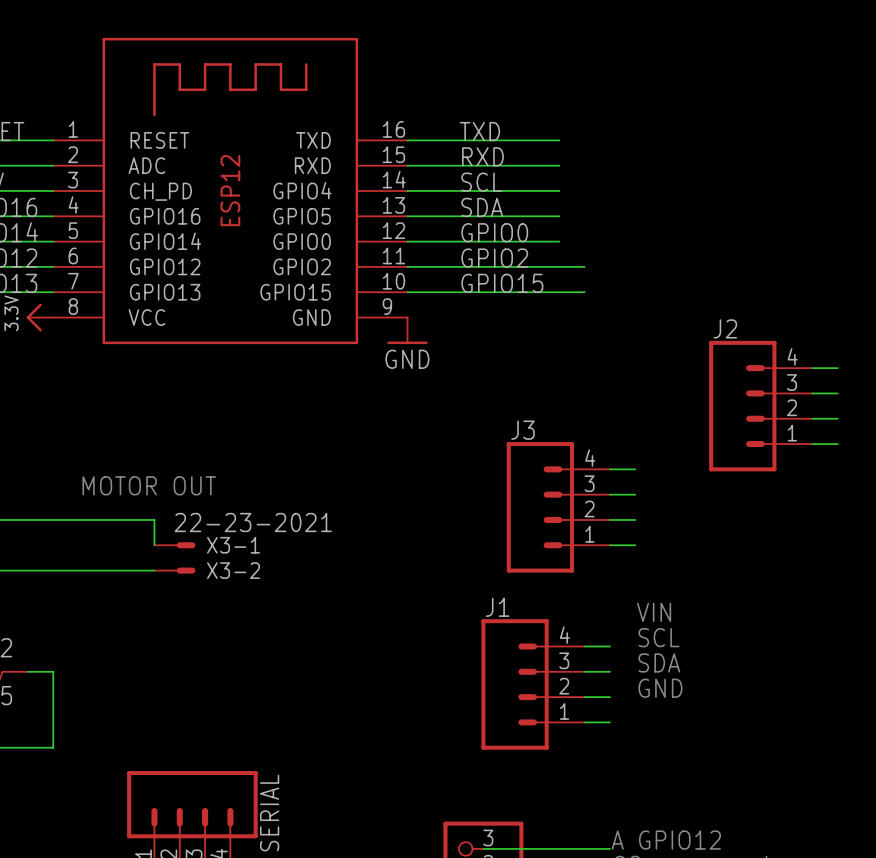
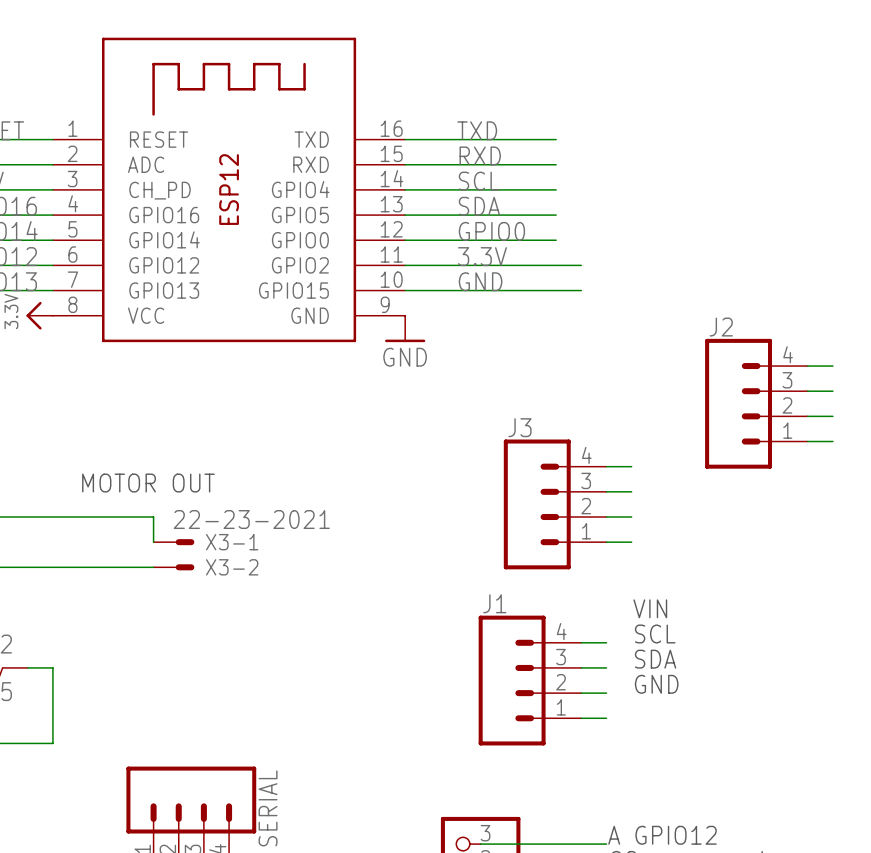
label: GPIO2 (494, 258) -> 3.3V (482, 256)
label: GPIO15 (502, 283) -> GND (480, 281)

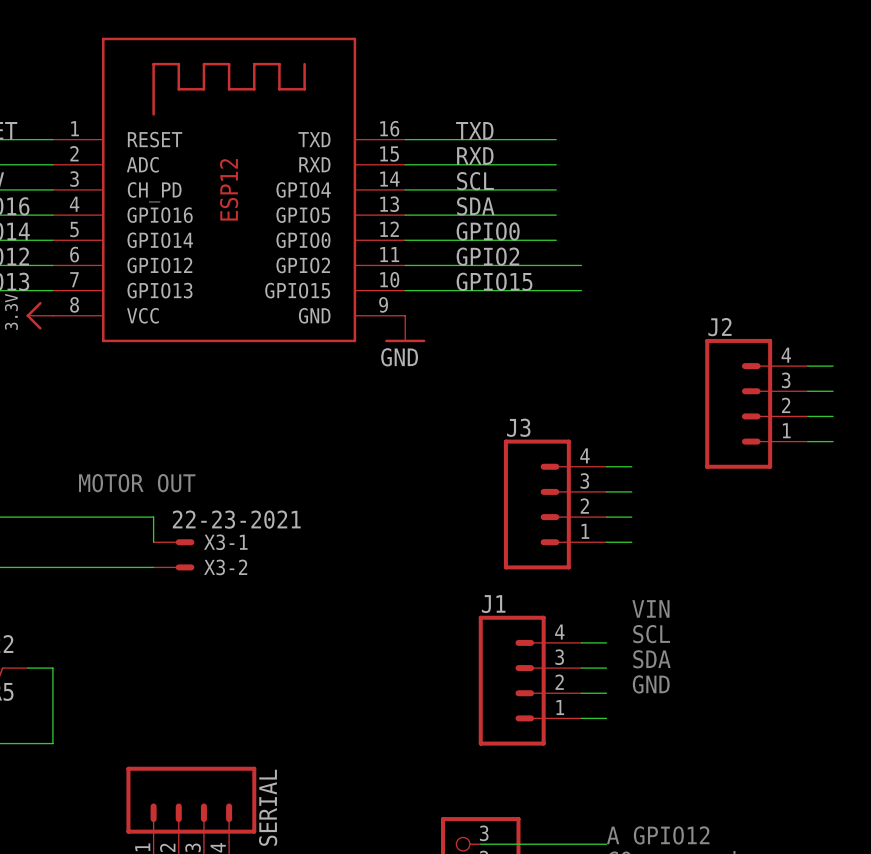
label: 3.3V (482, 256) -> GPIO2 (487, 256)
label: GND (480, 281) -> GPIO15 (494, 281)

